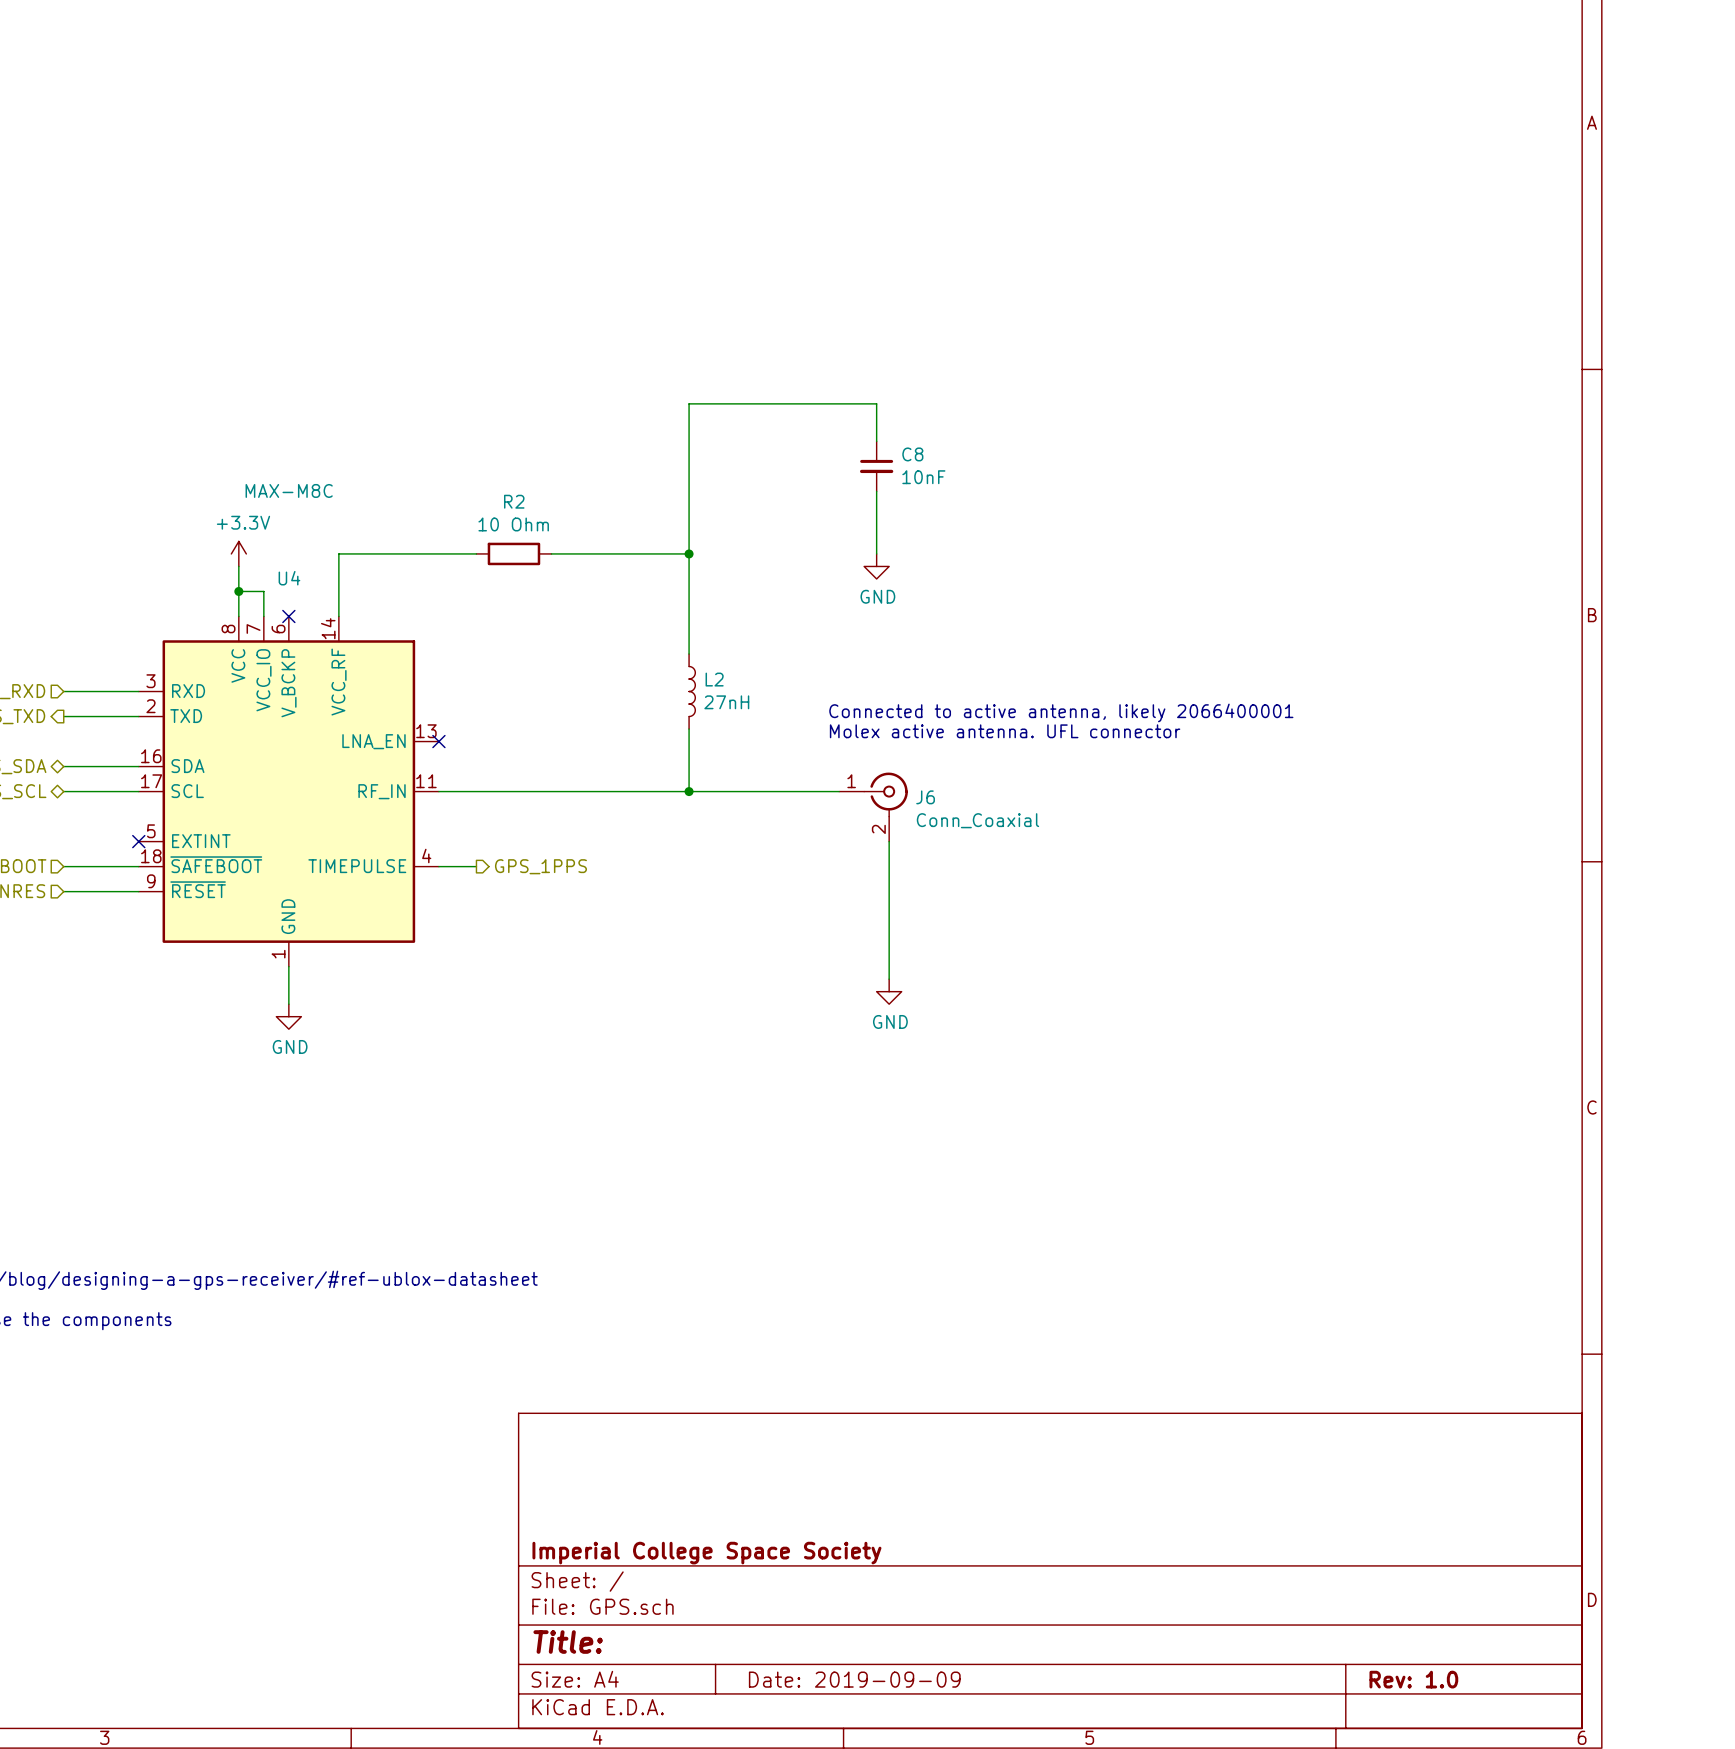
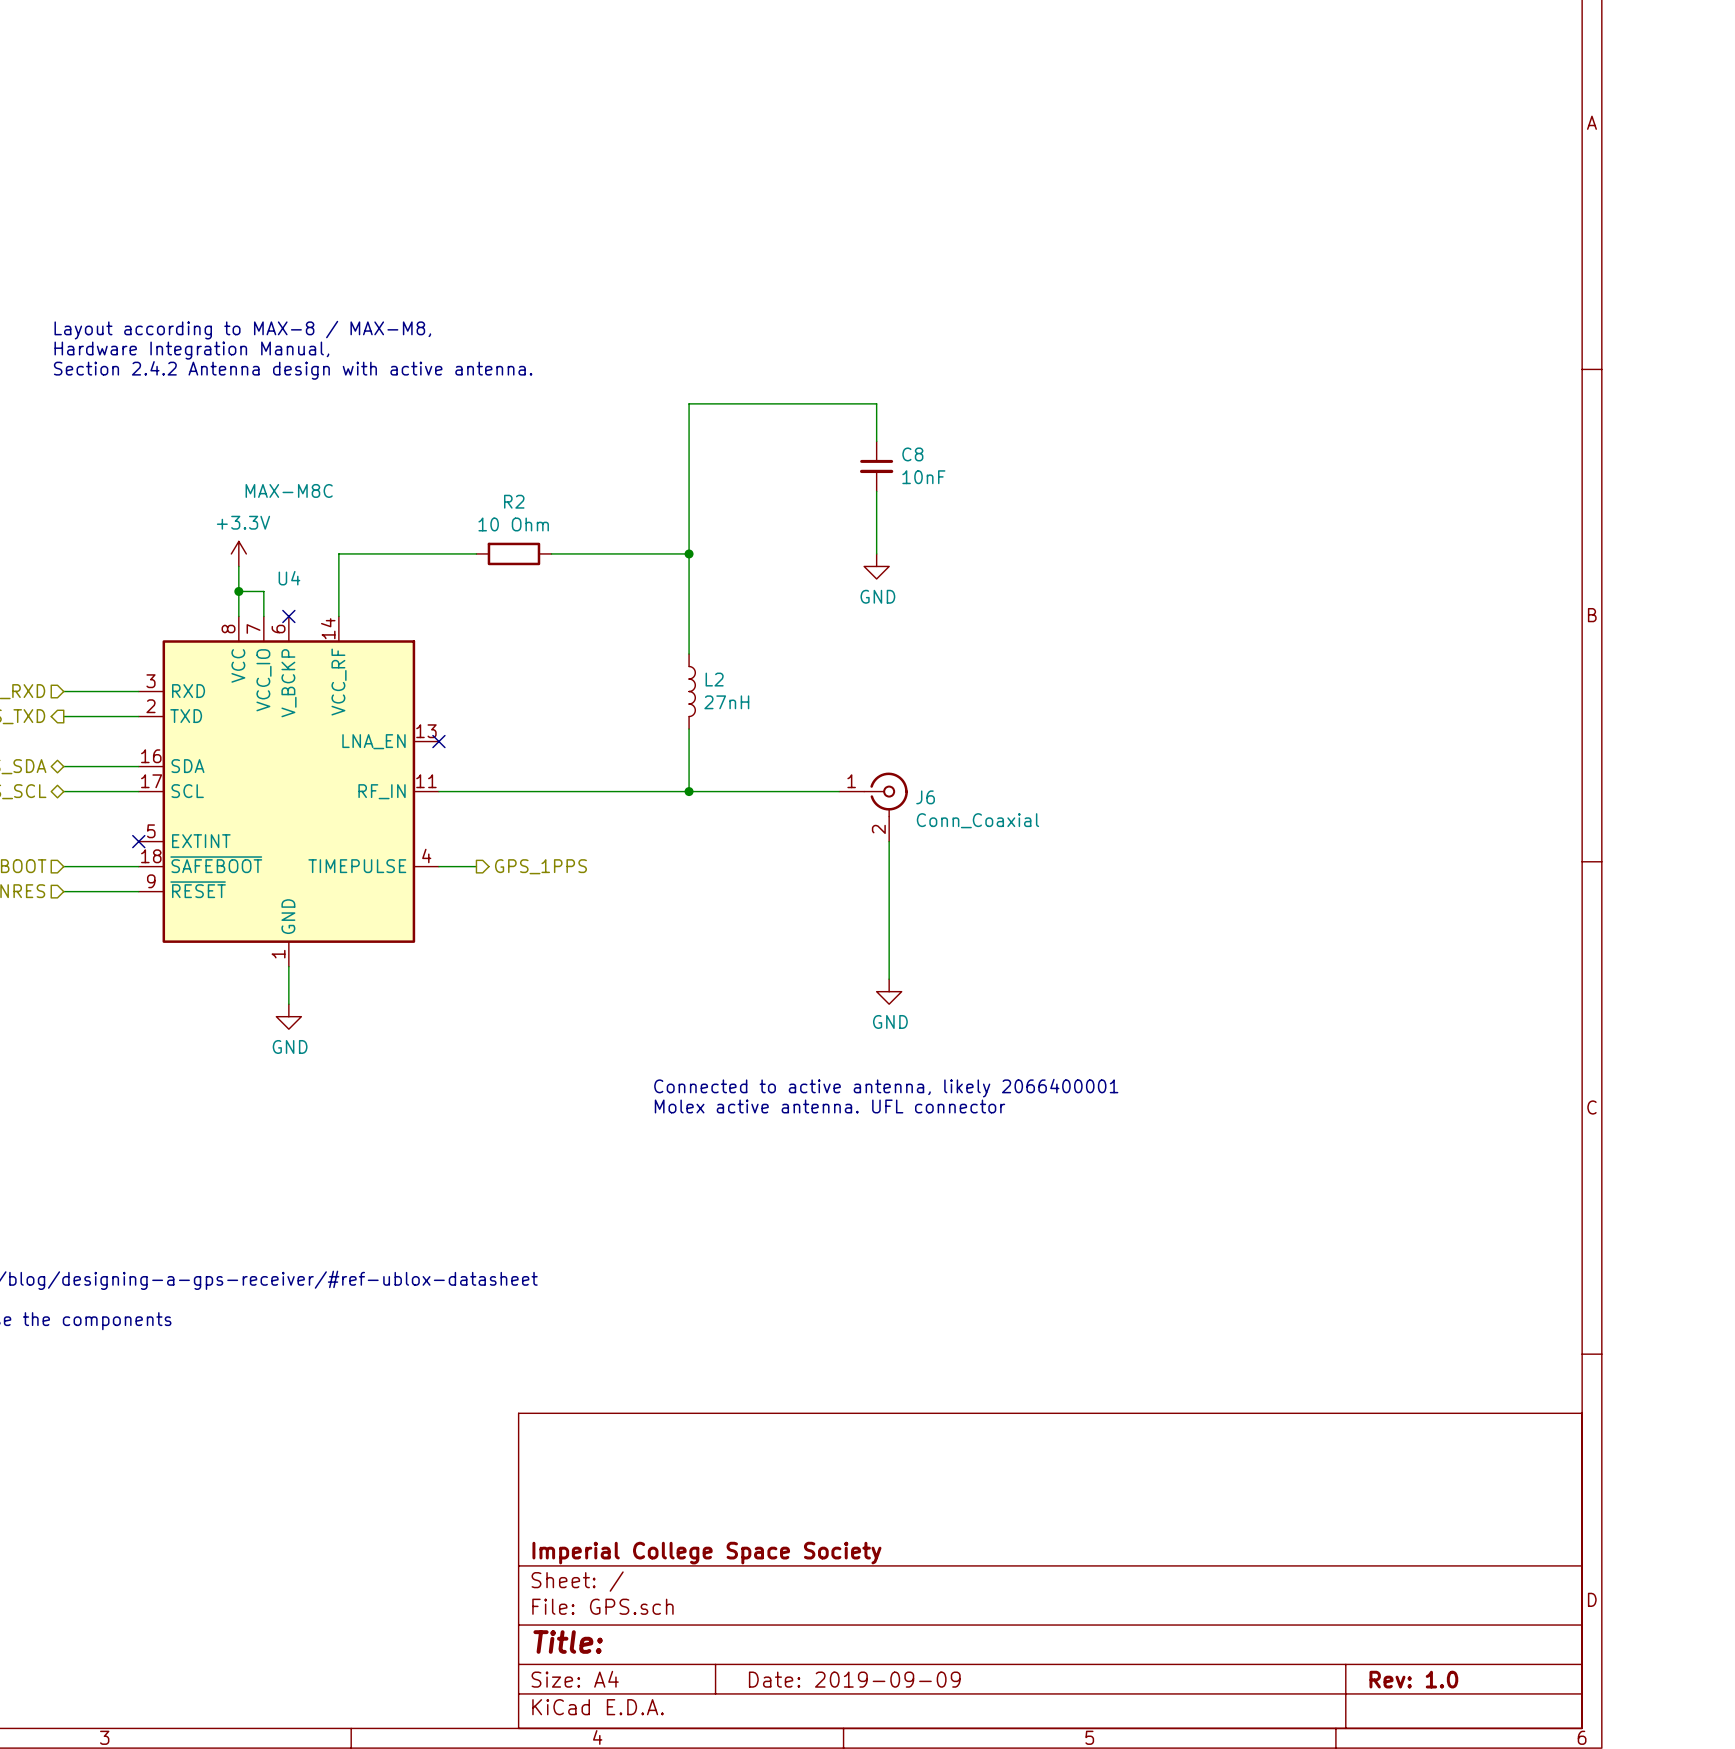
text: none -> Layout according to MAX-8 / MAX-M8, (242, 330)
text: none -> Hardware Integration Manual, (191, 350)
text: none -> Section 2.4.2 Antenna design with active antenna. (293, 370)
text: Connected to active antenna, likely 2066400001 (1061, 712) -> none
text: Molex active antenna. UFL connector (1005, 731) -> none
text: none -> Connected to active antenna, likely 2066400001 (886, 1088)
text: none -> Molex active antenna. UFL connector (829, 1106)

